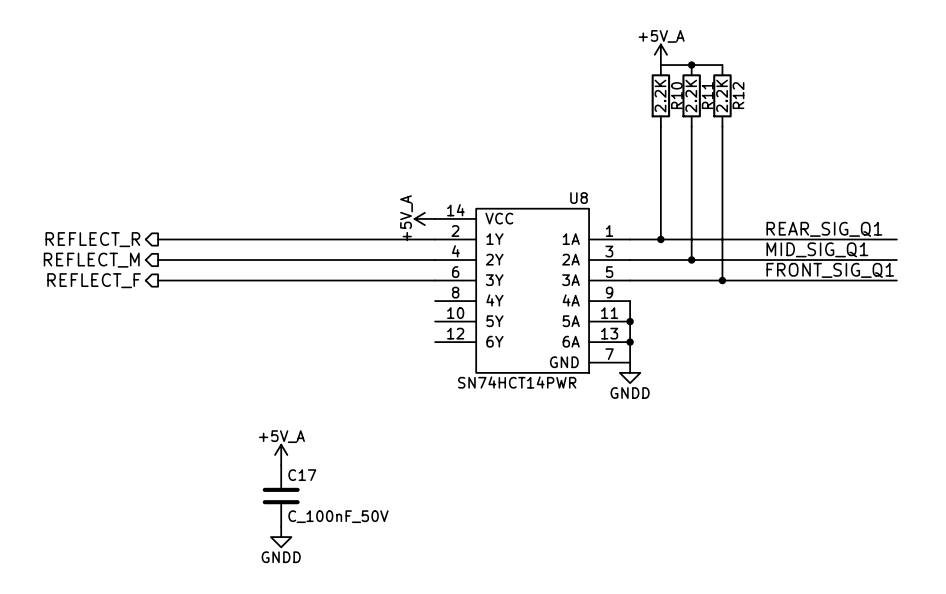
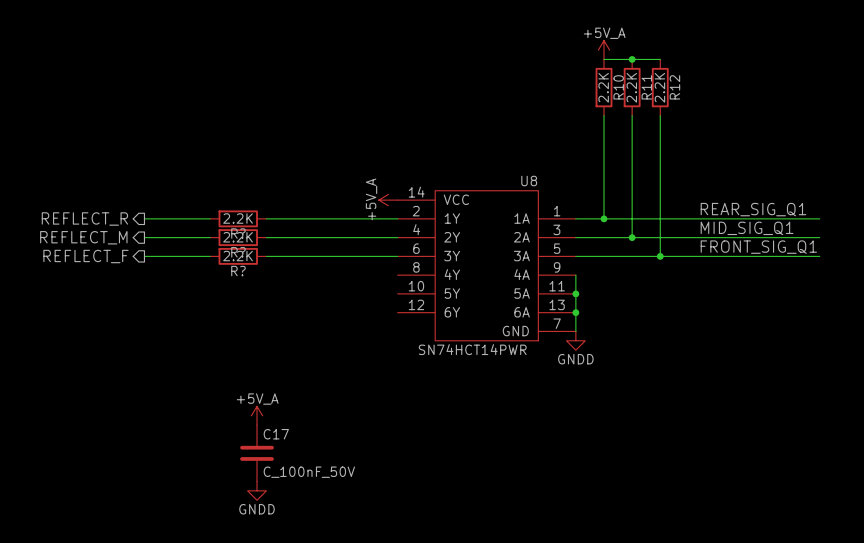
R?: none -> 2.2K (238, 218)
R?: none -> 2.2K (238, 237)
R?: none -> 2.2K (238, 256)

